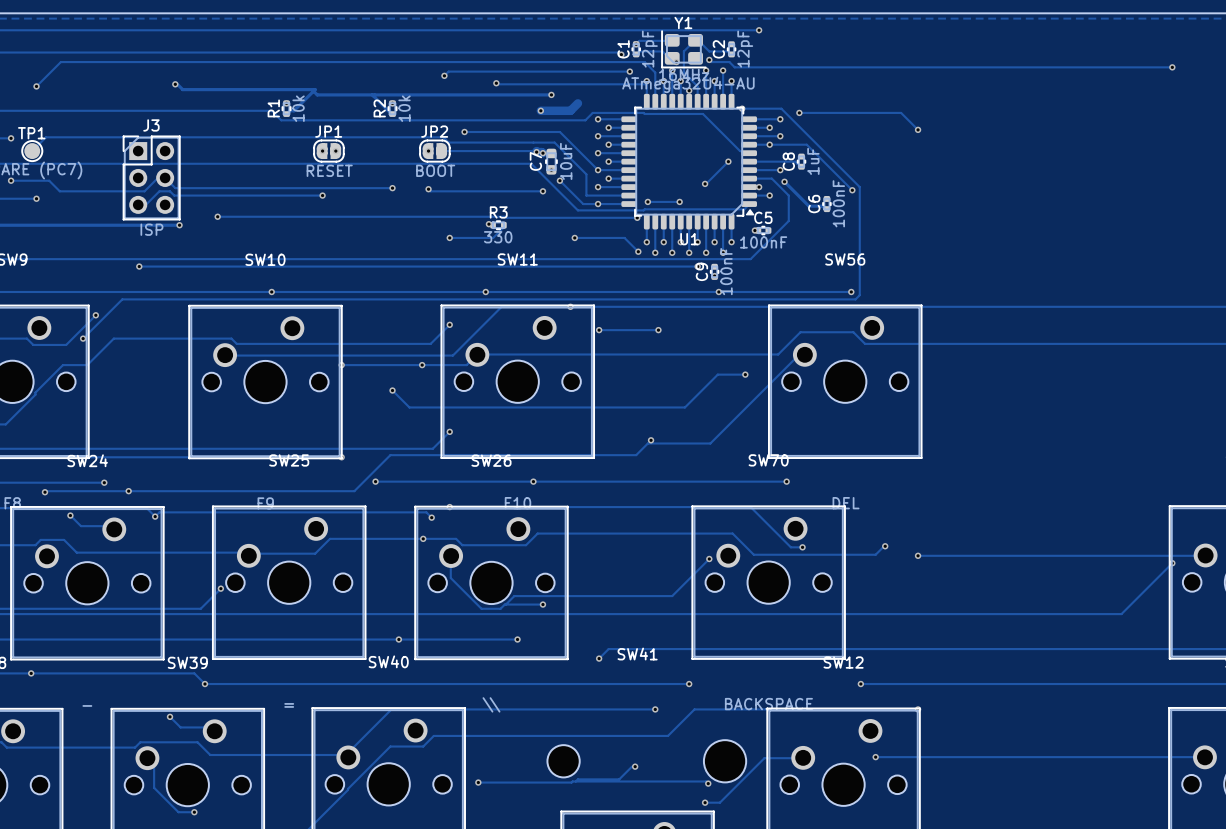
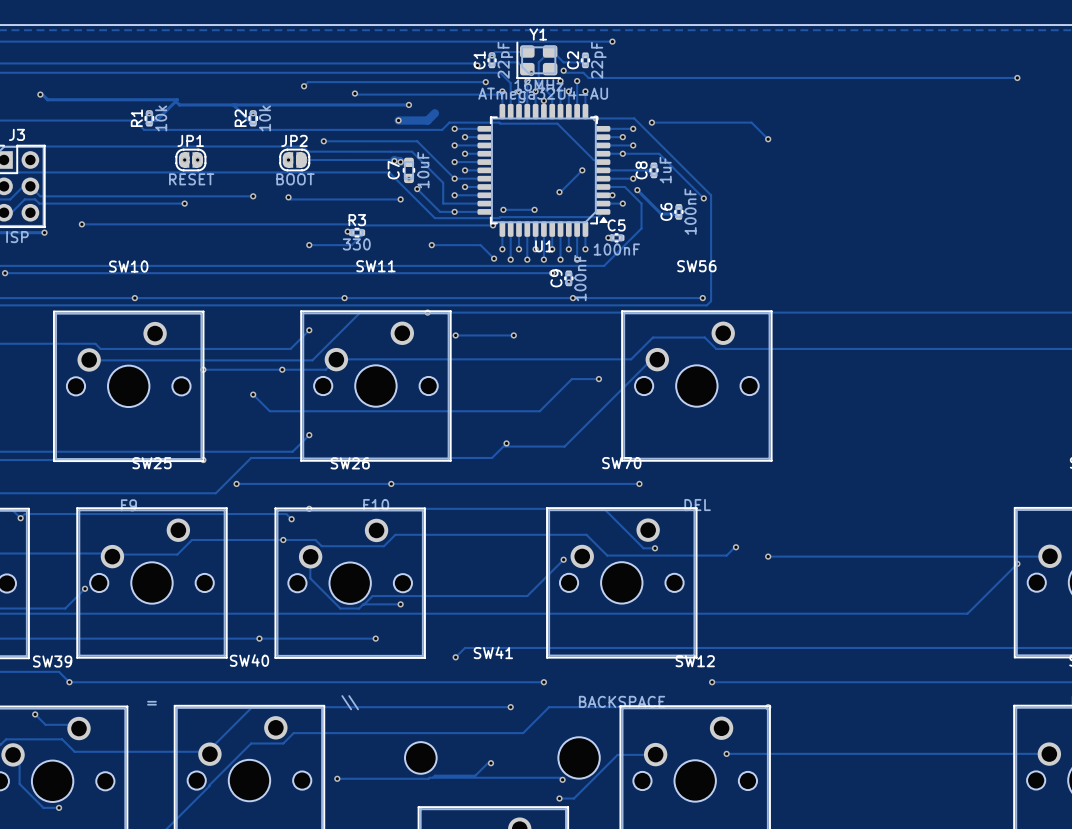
C1 value: 12pF (649, 49) -> 22pF (505, 60)
C2 value: 12pF (745, 49) -> 22pF (598, 60)

